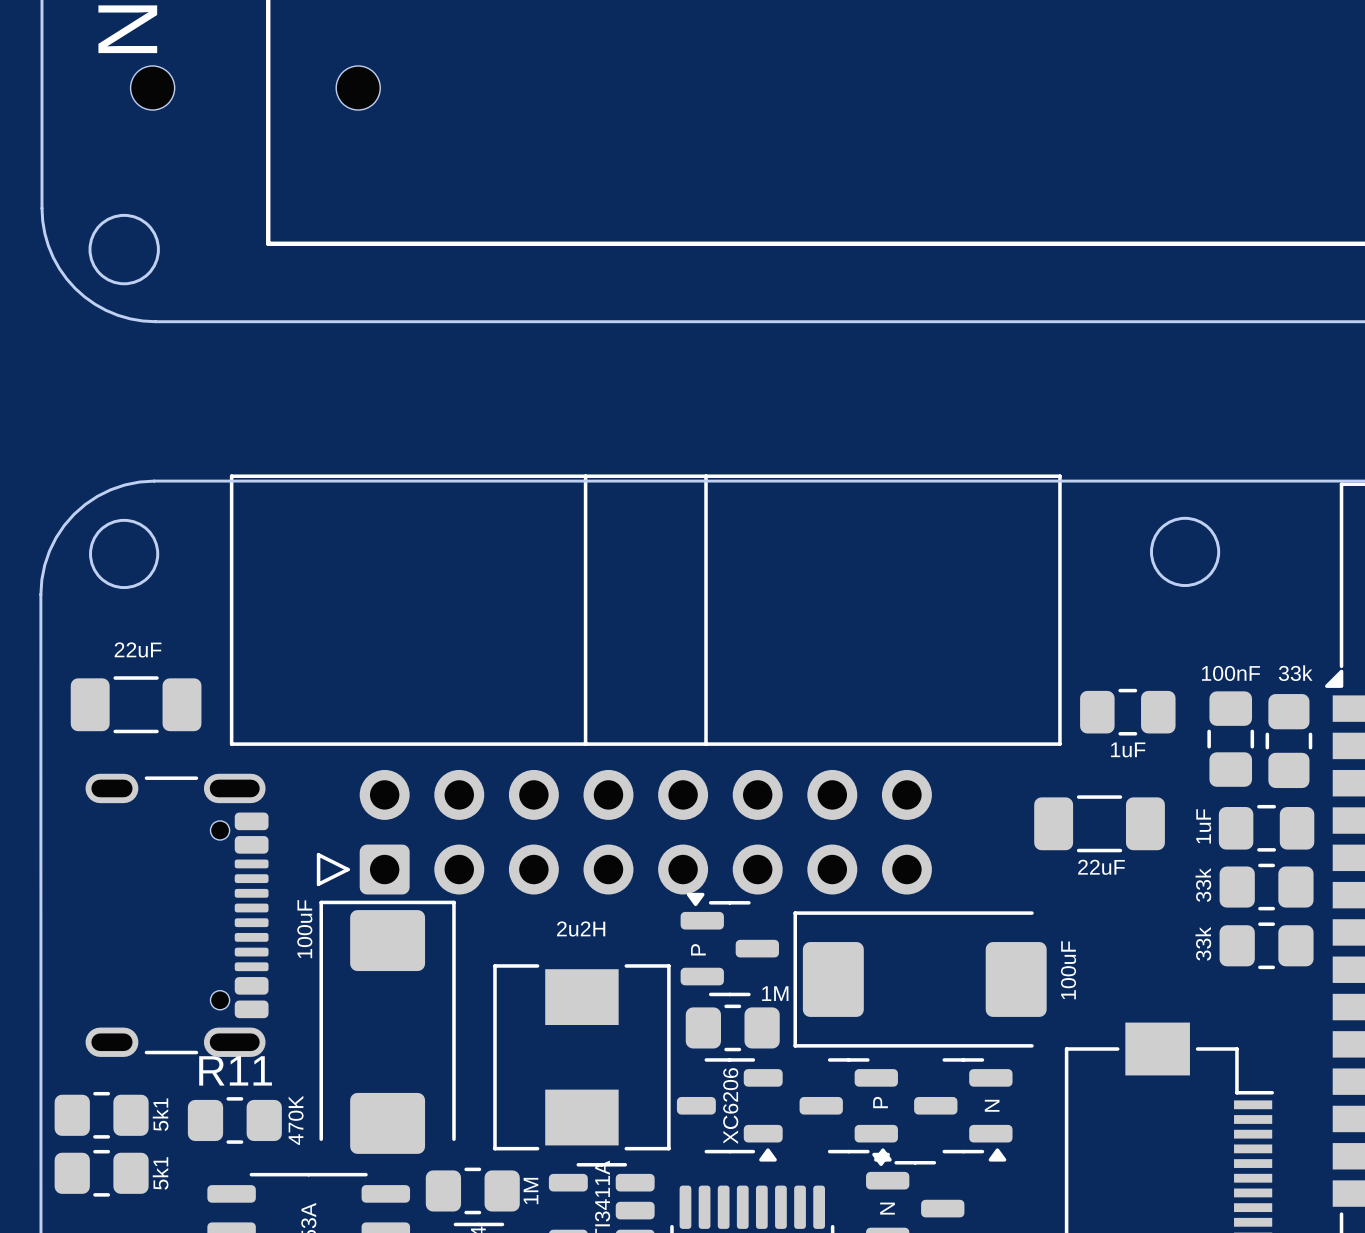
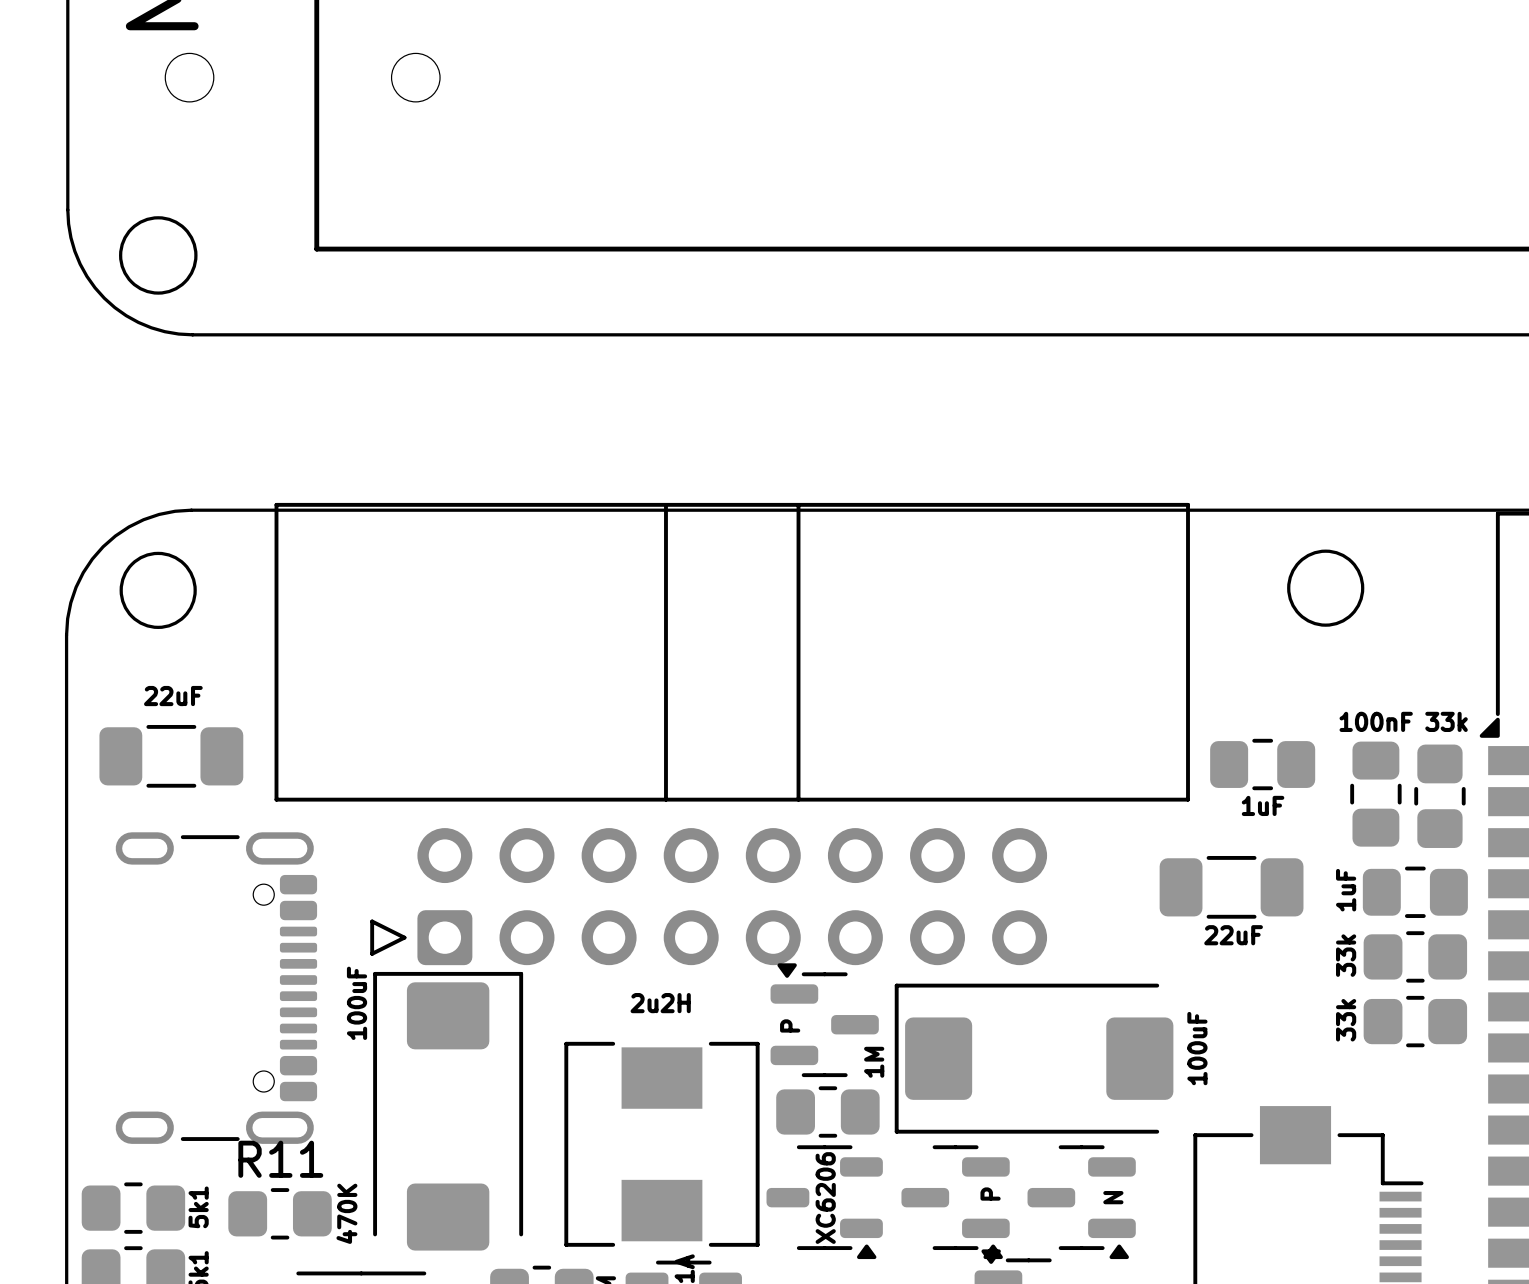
text rotation: 0° (775, 993) -> 90° counterclockwise (874, 1062)

